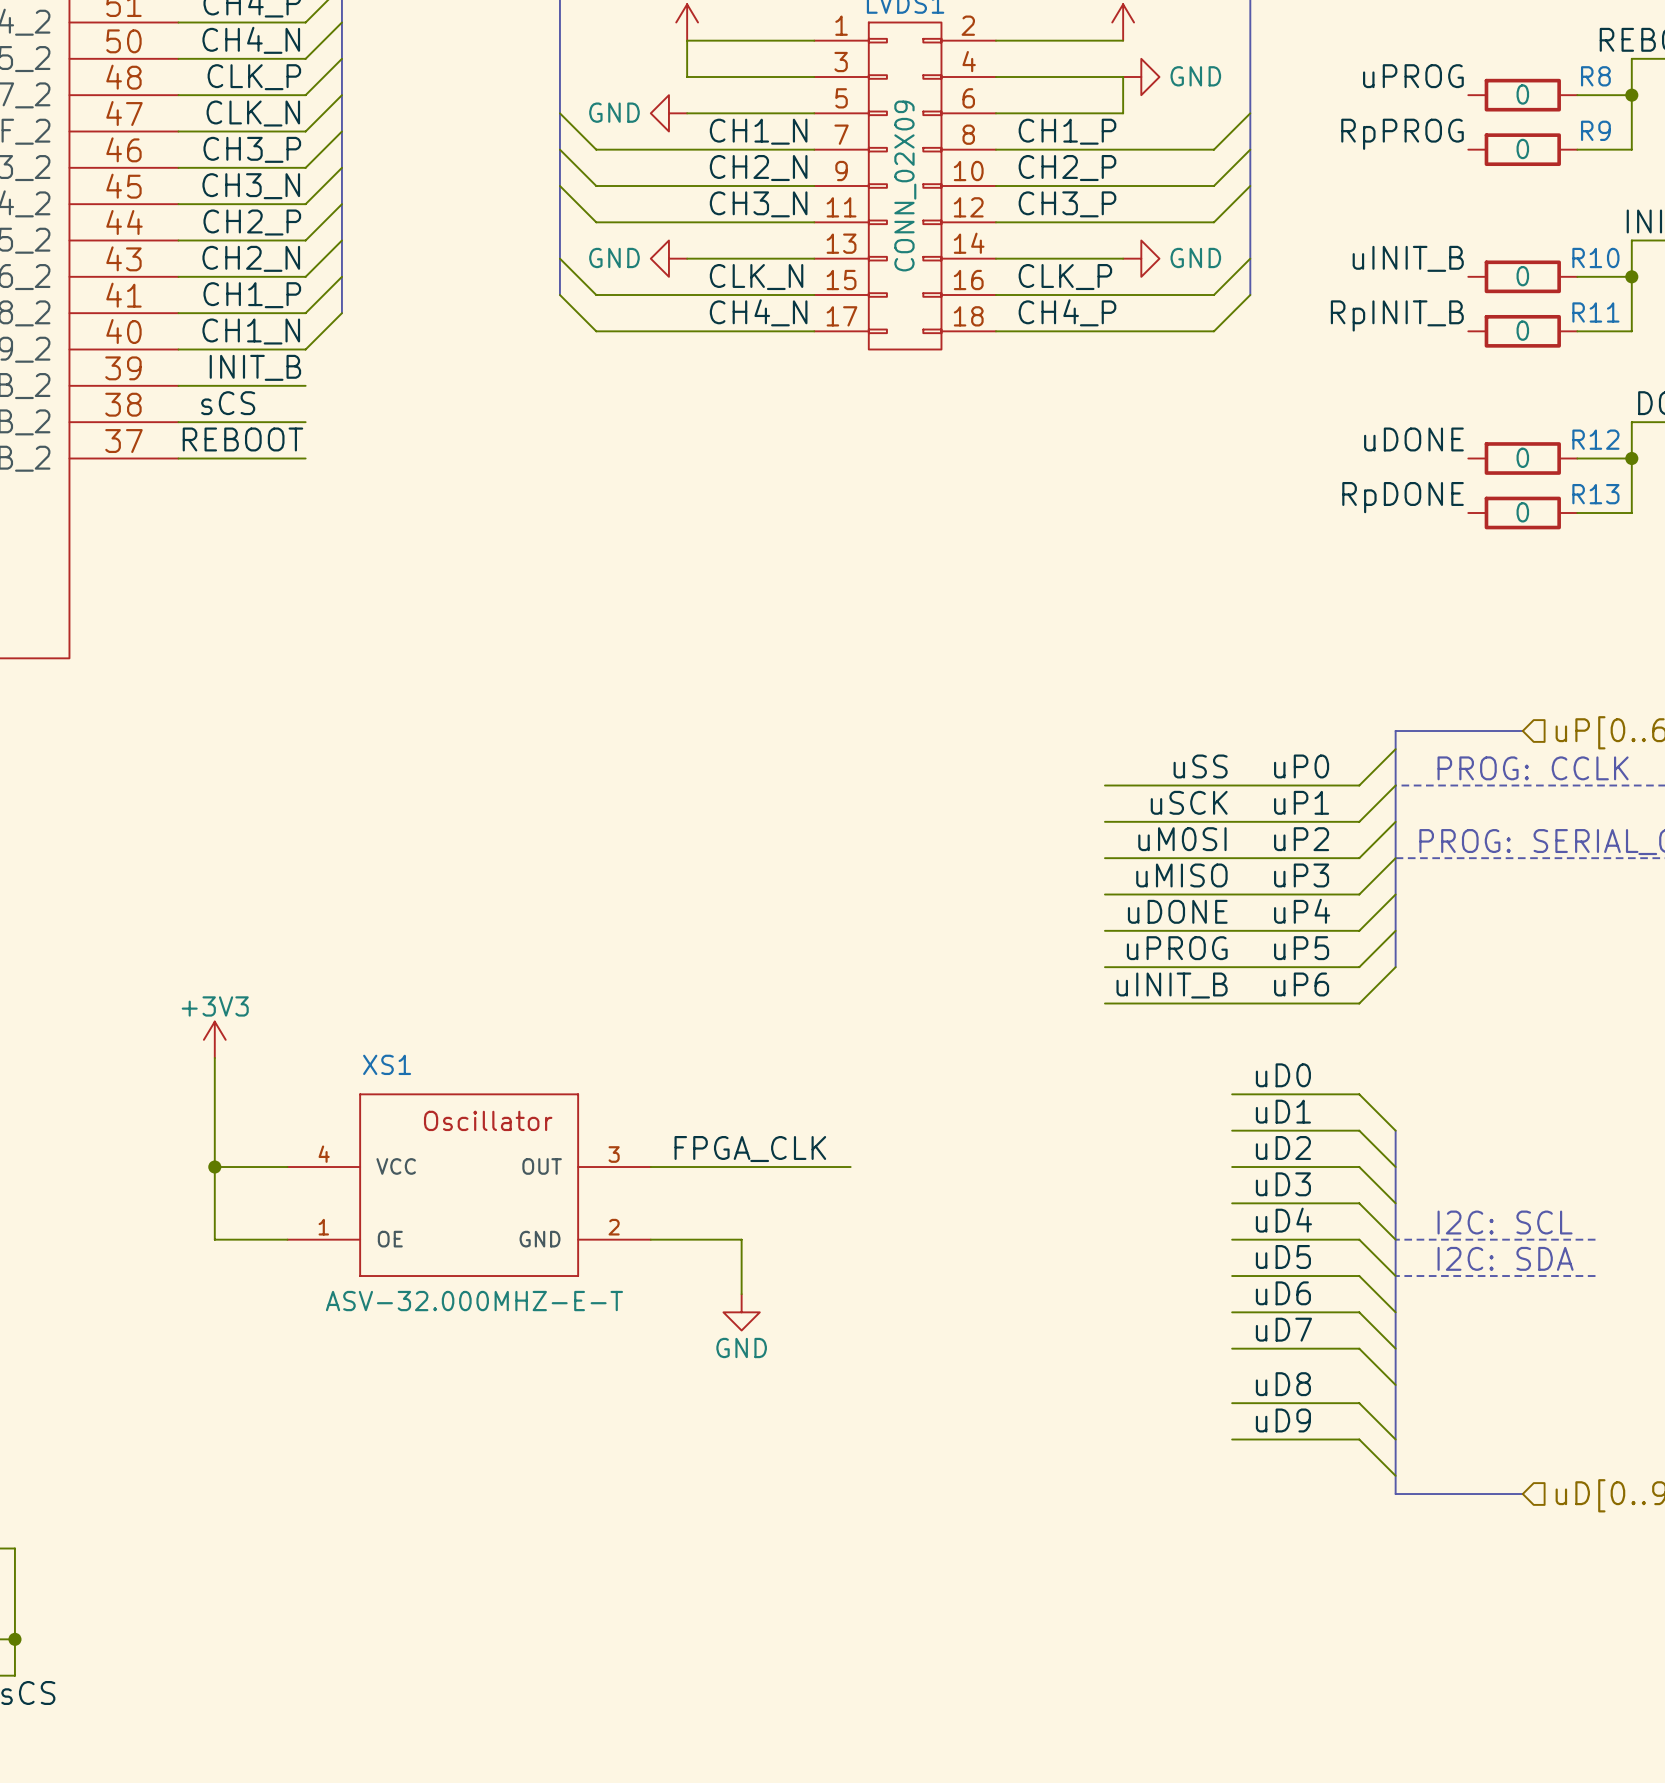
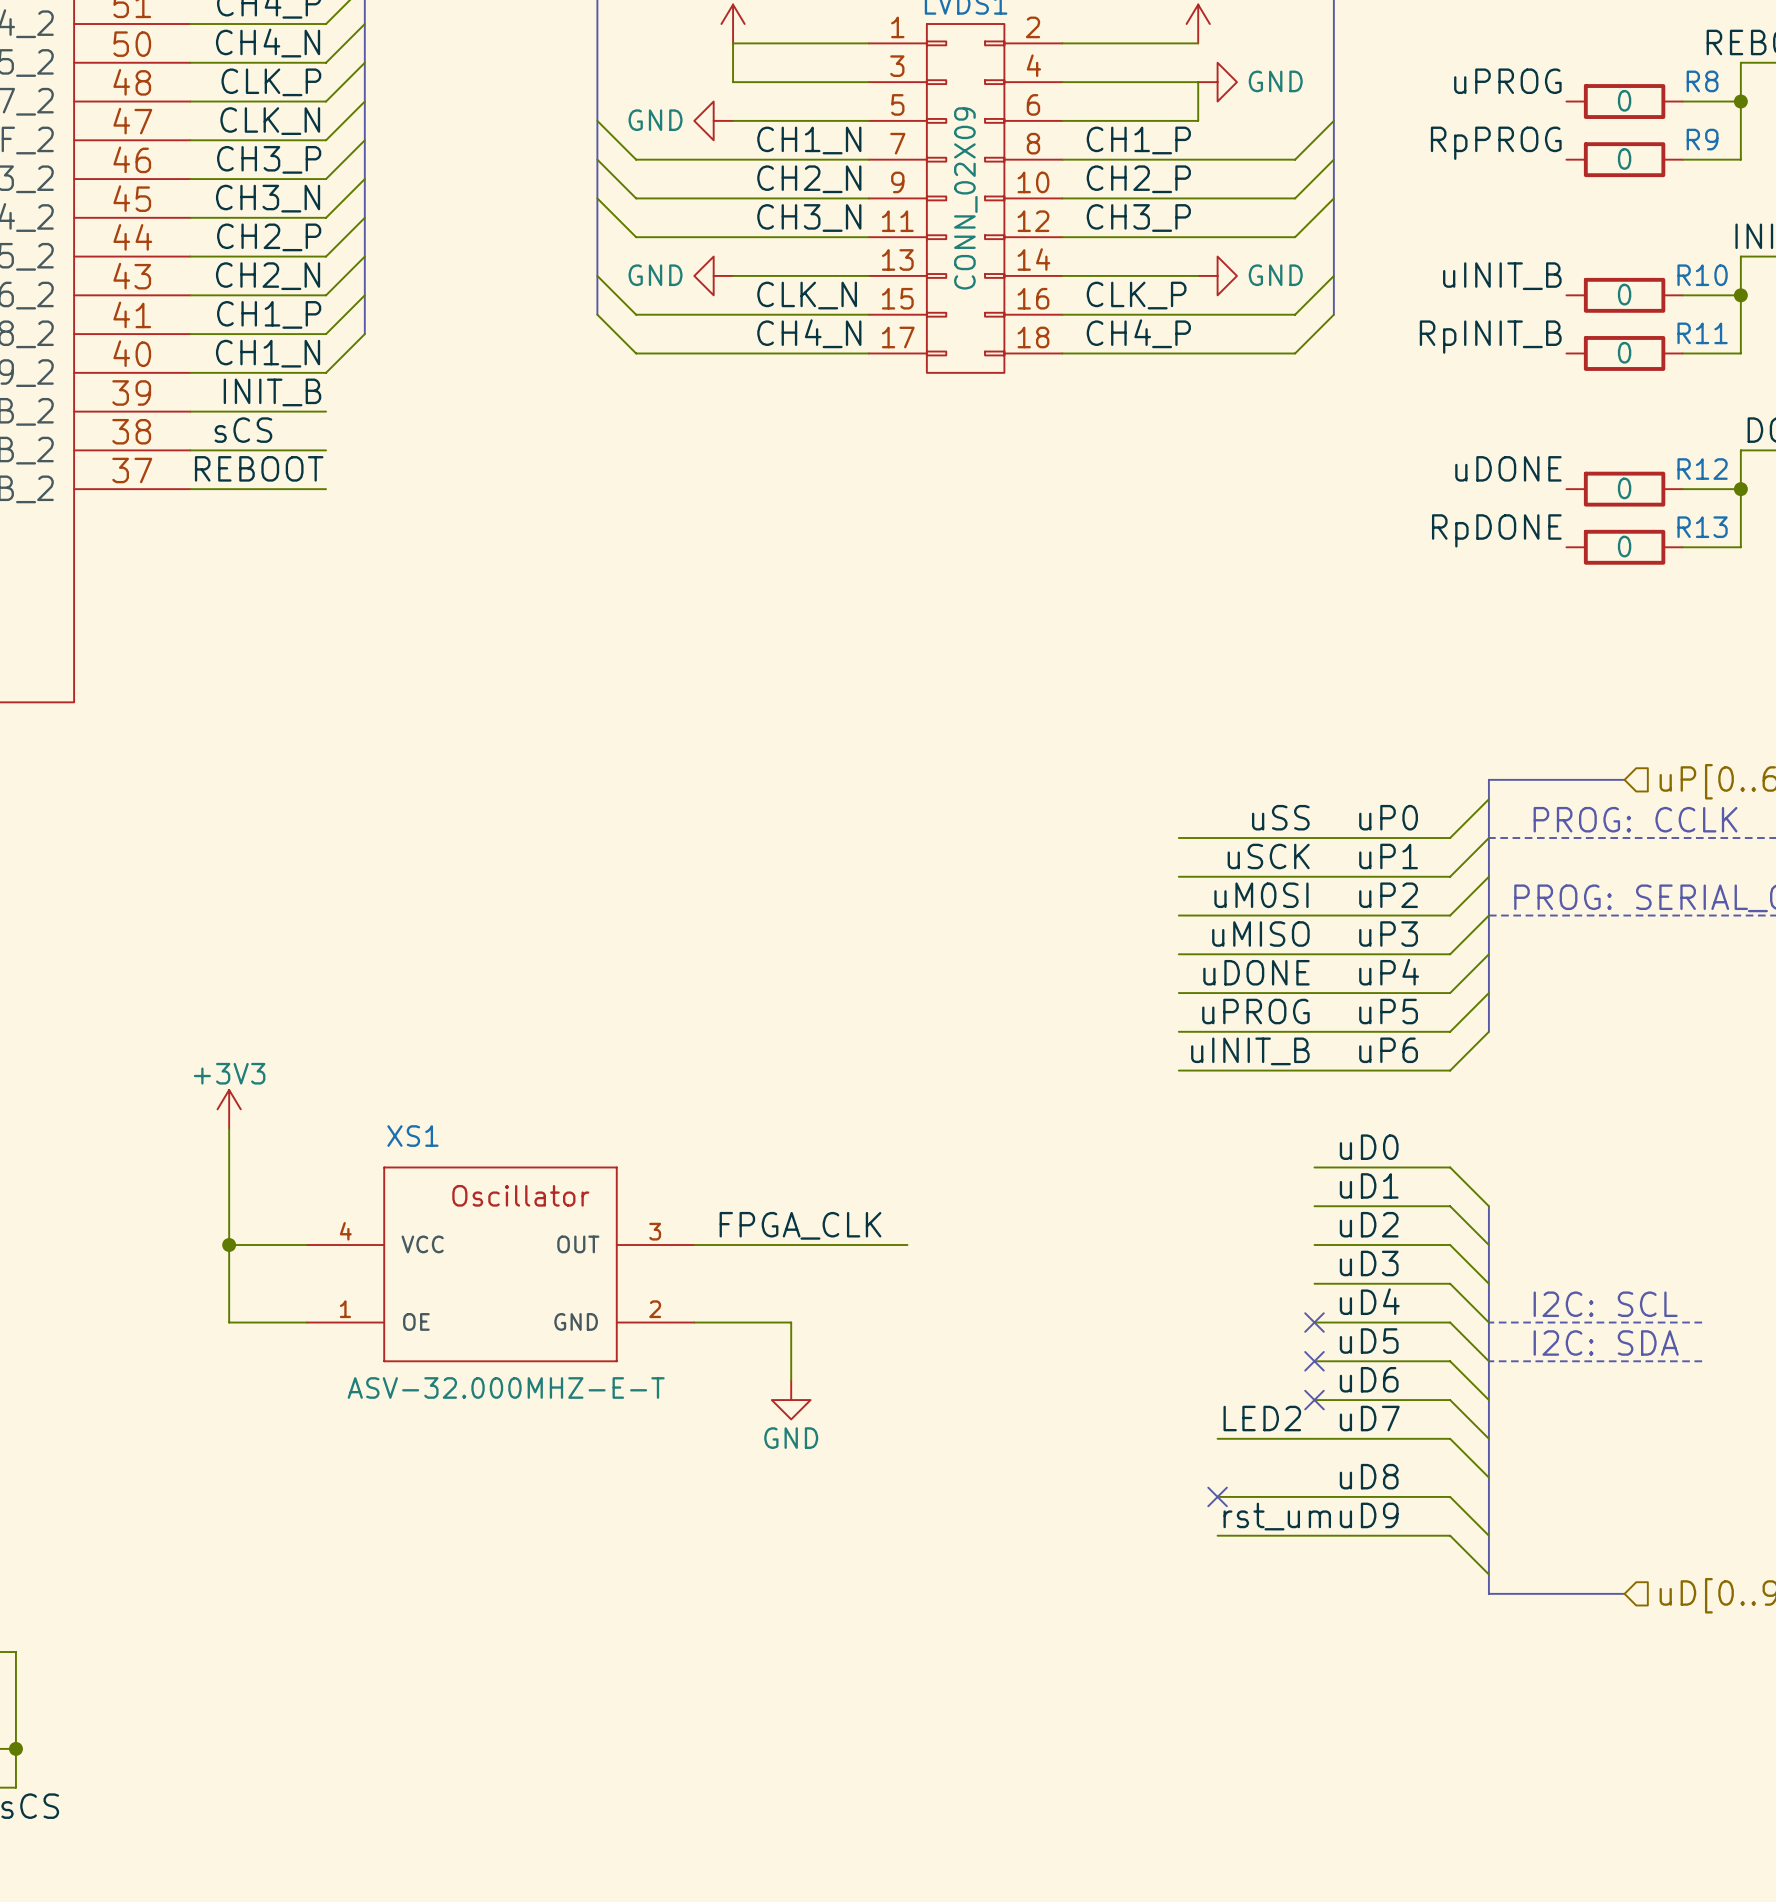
no-connect mark: none -> (1314, 1322)
no-connect mark: none -> (1314, 1361)
no-connect mark: none -> (1314, 1400)
label: none -> LED2 (1262, 1418)
wire: none -> (1217, 1438) (1314, 1438)
wire: none -> (1217, 1496) (1314, 1496)
no-connect mark: none -> (1217, 1496)
label: none -> rst_um (1277, 1516)
wire: none -> (1217, 1535) (1314, 1535)

